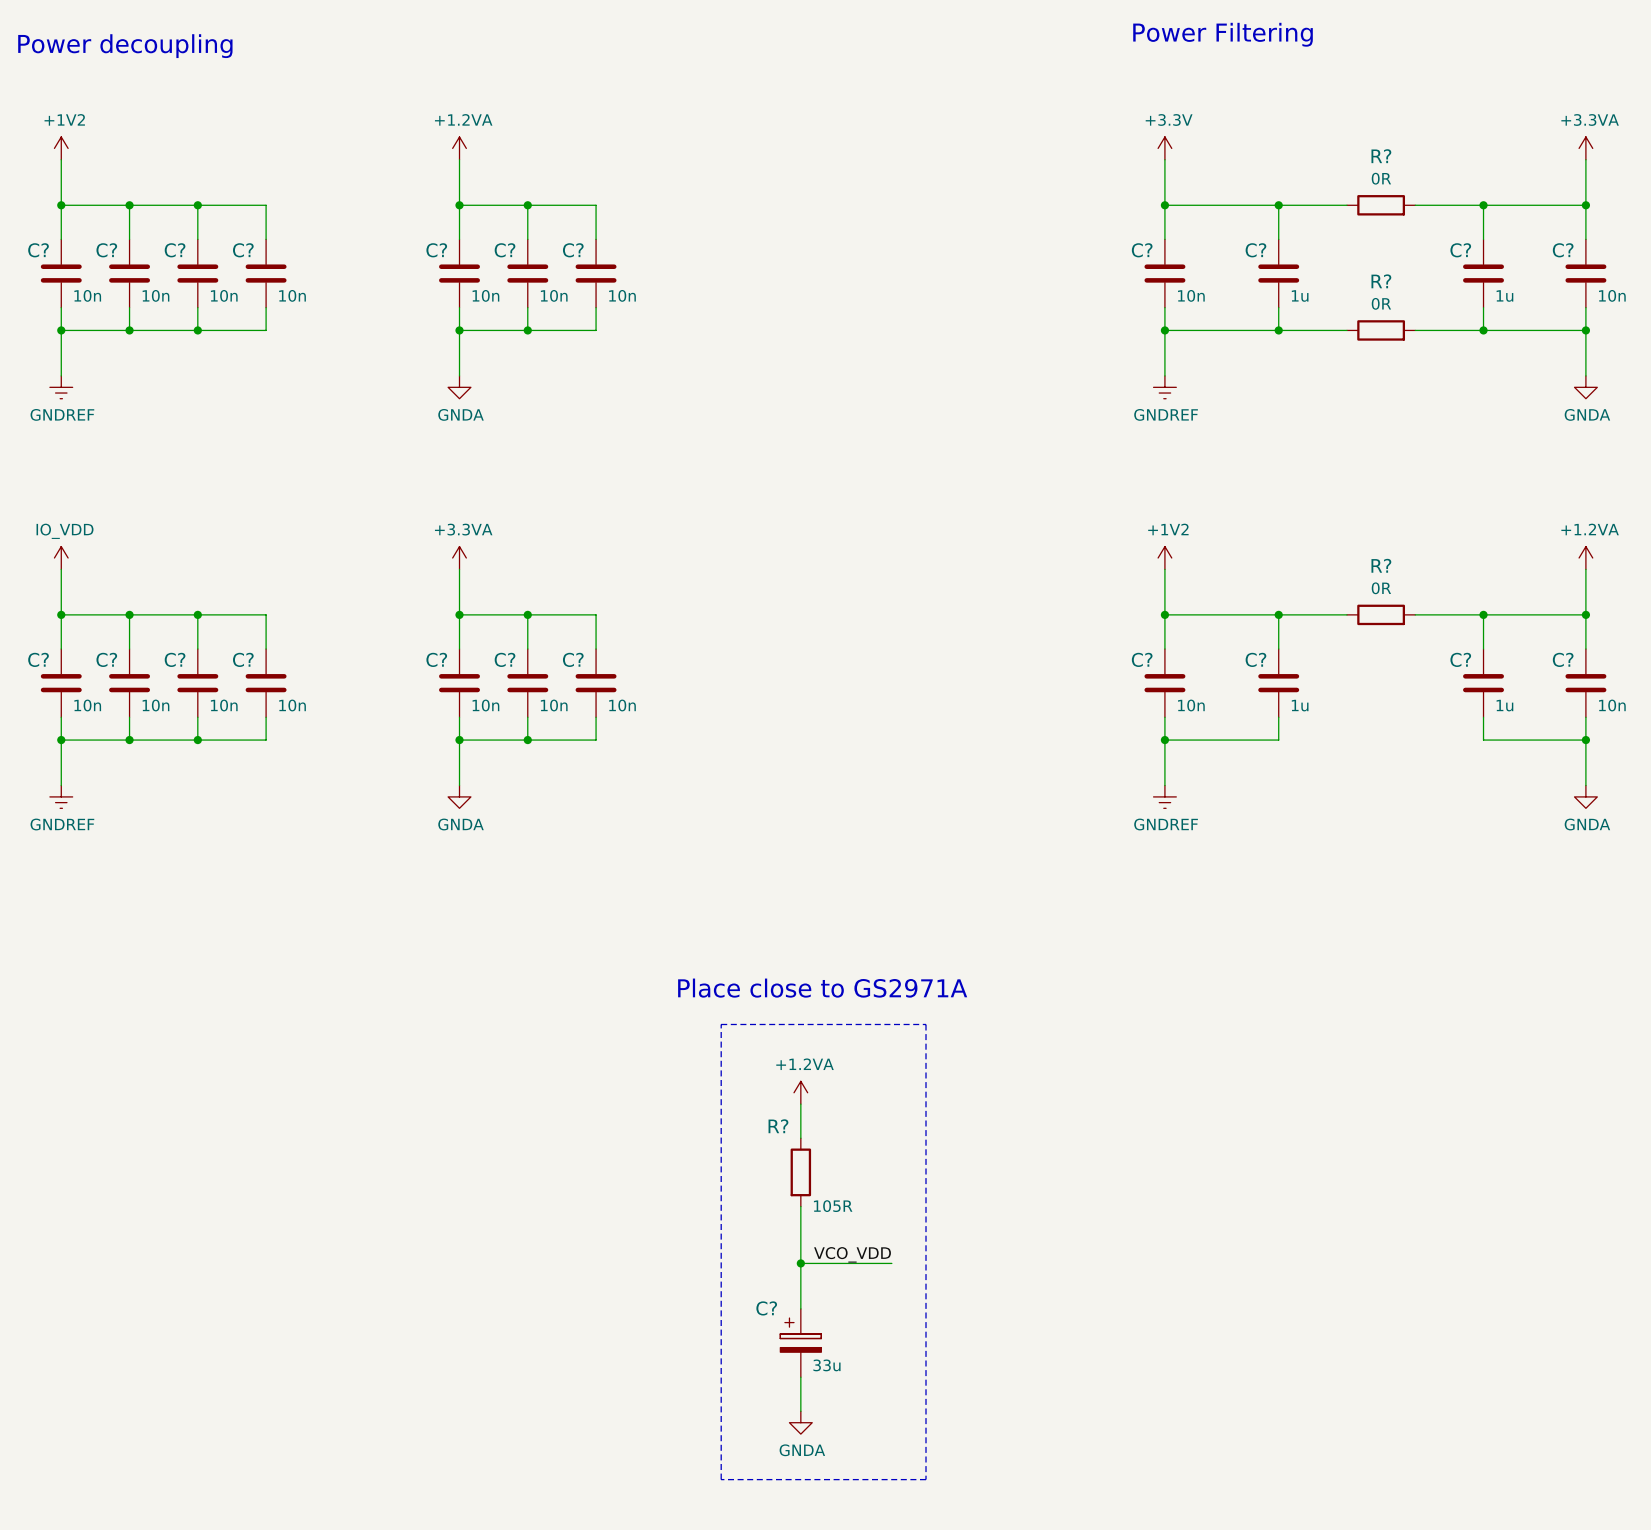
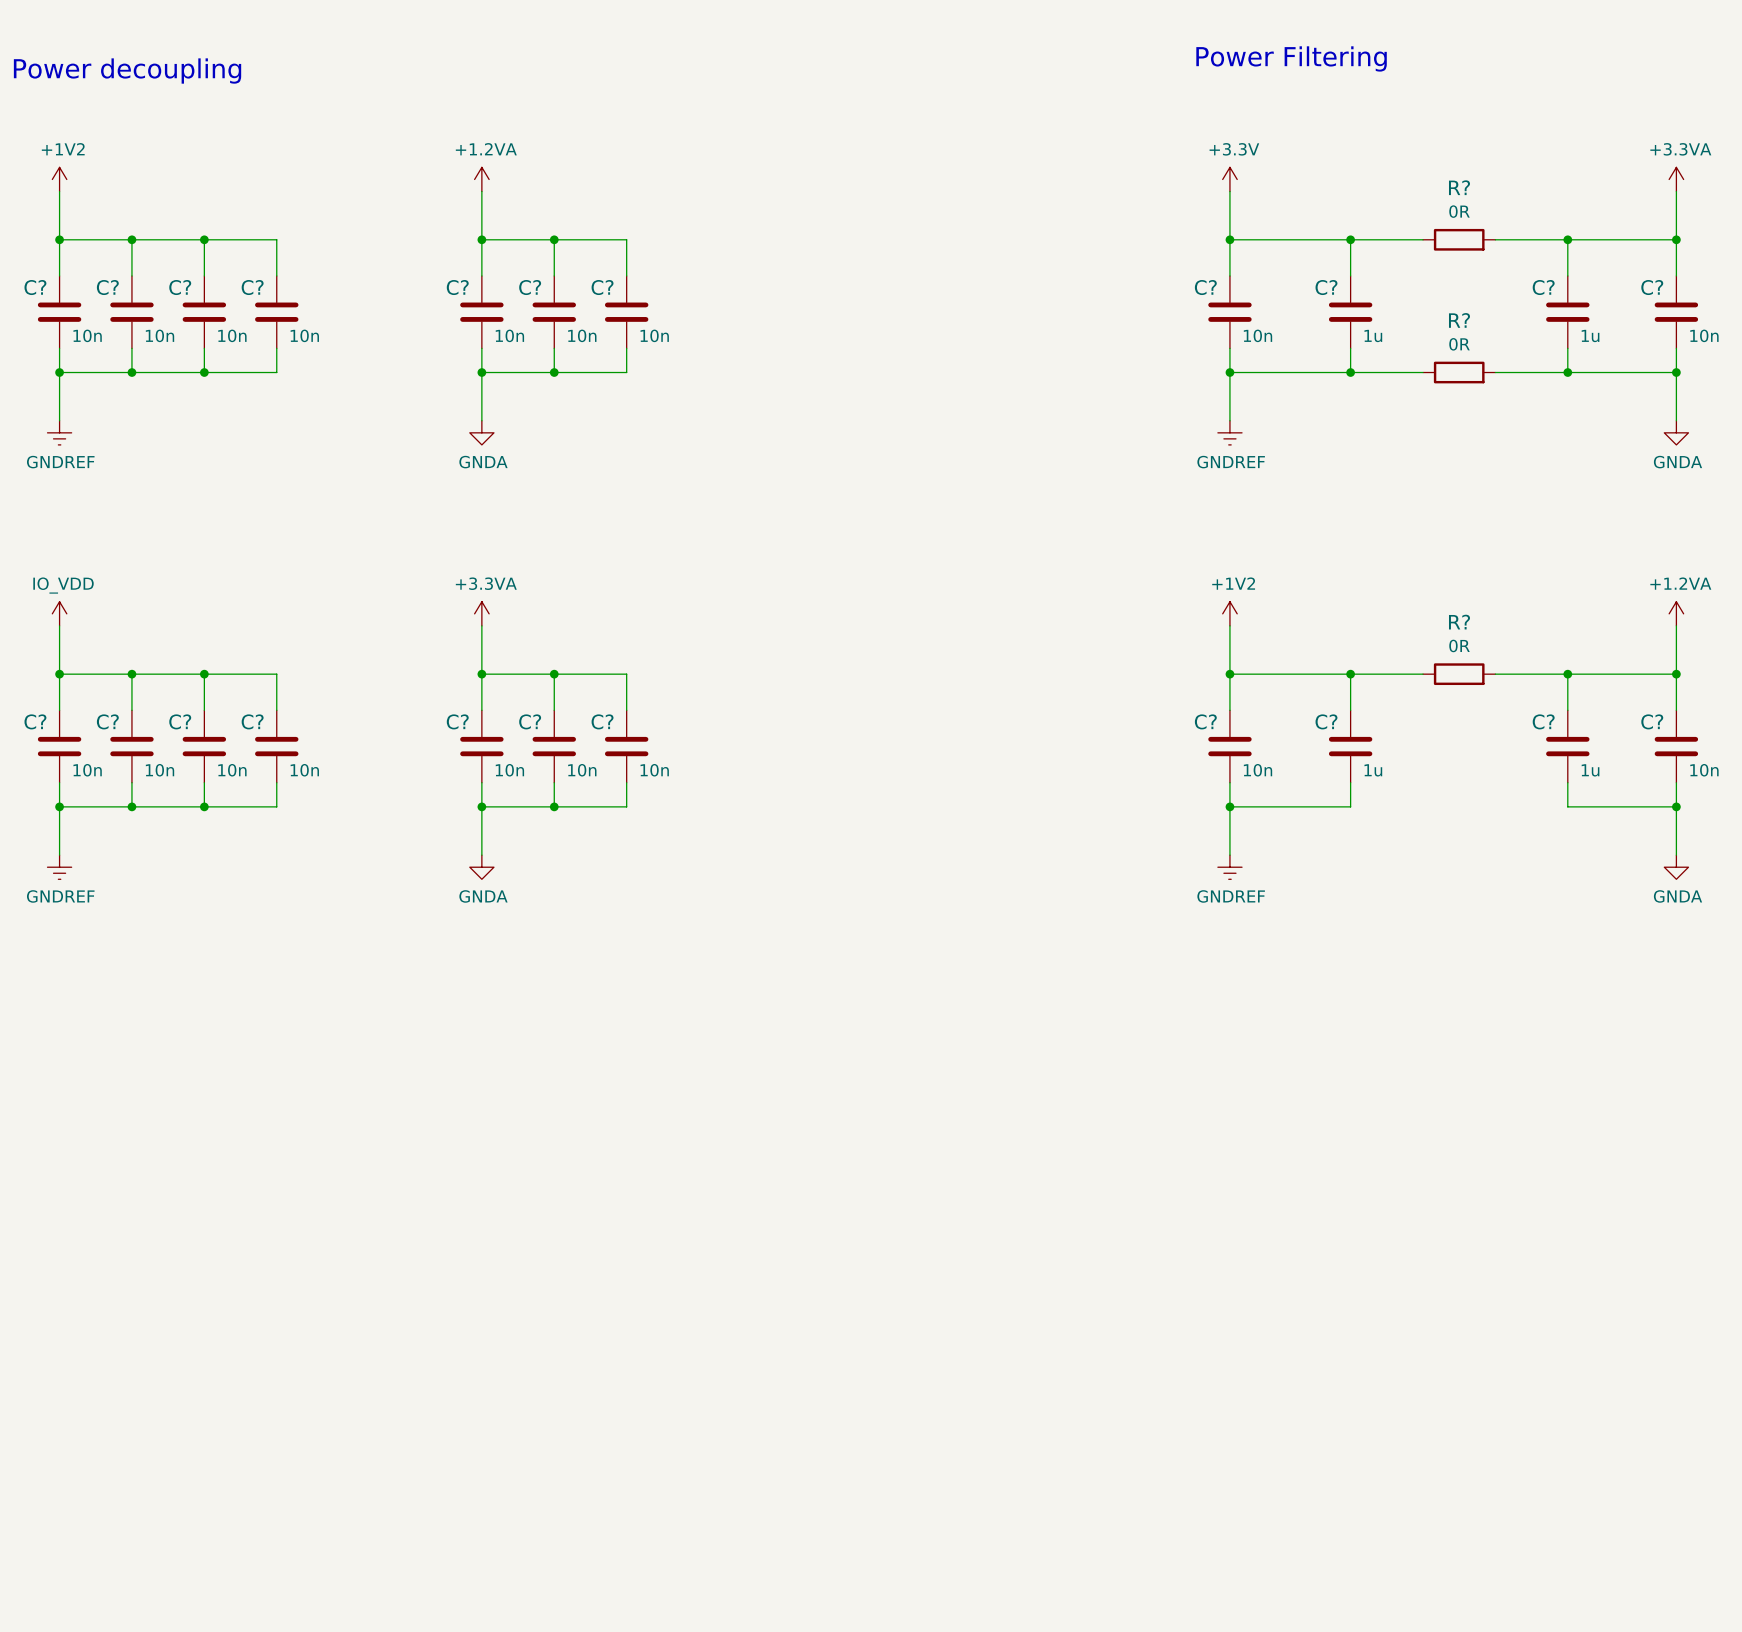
text: Place close to GS2971A (822, 988) -> none
line: (721, 1024) (721, 1479) (926, 1479) (926, 1024) (721, 1024) -> none
power symbol: (800, 1092) -> none
wire: (800, 1104) (800, 1138) -> none
R?: (800, 1172) -> none
wire: (800, 1206) (800, 1308) -> none
label: VCO_VDD (852, 1254) -> none
wire: (800, 1263) (891, 1263) -> none
junction: (800, 1263) -> none
C?: (800, 1343) -> none
wire: (800, 1377) (800, 1411) -> none
power symbol: GNDA (800, 1422) -> none

